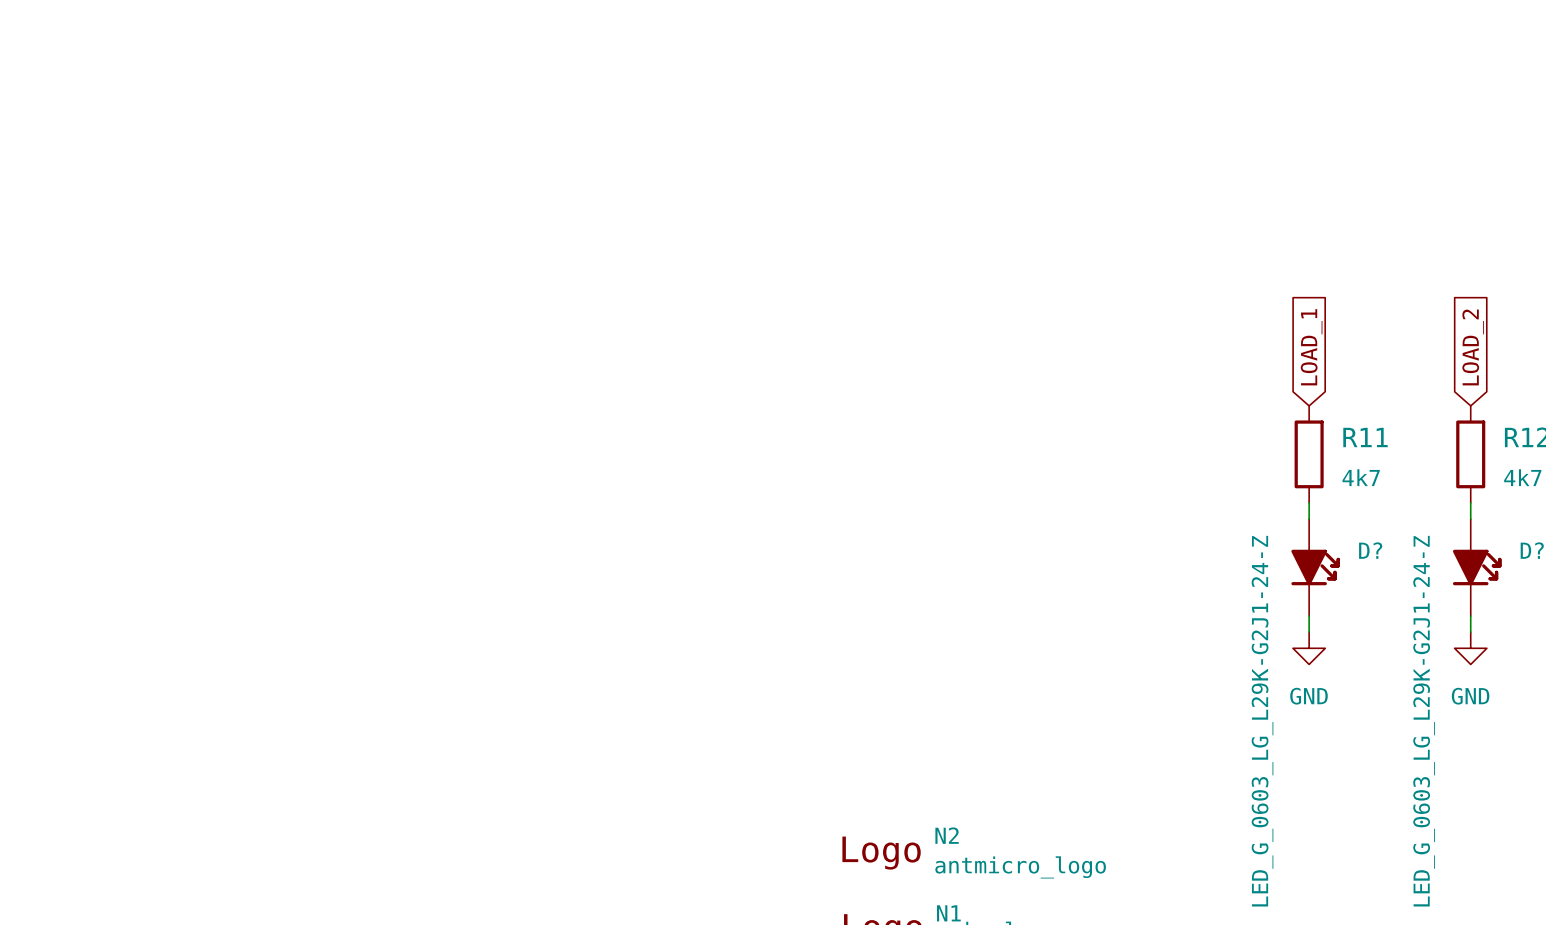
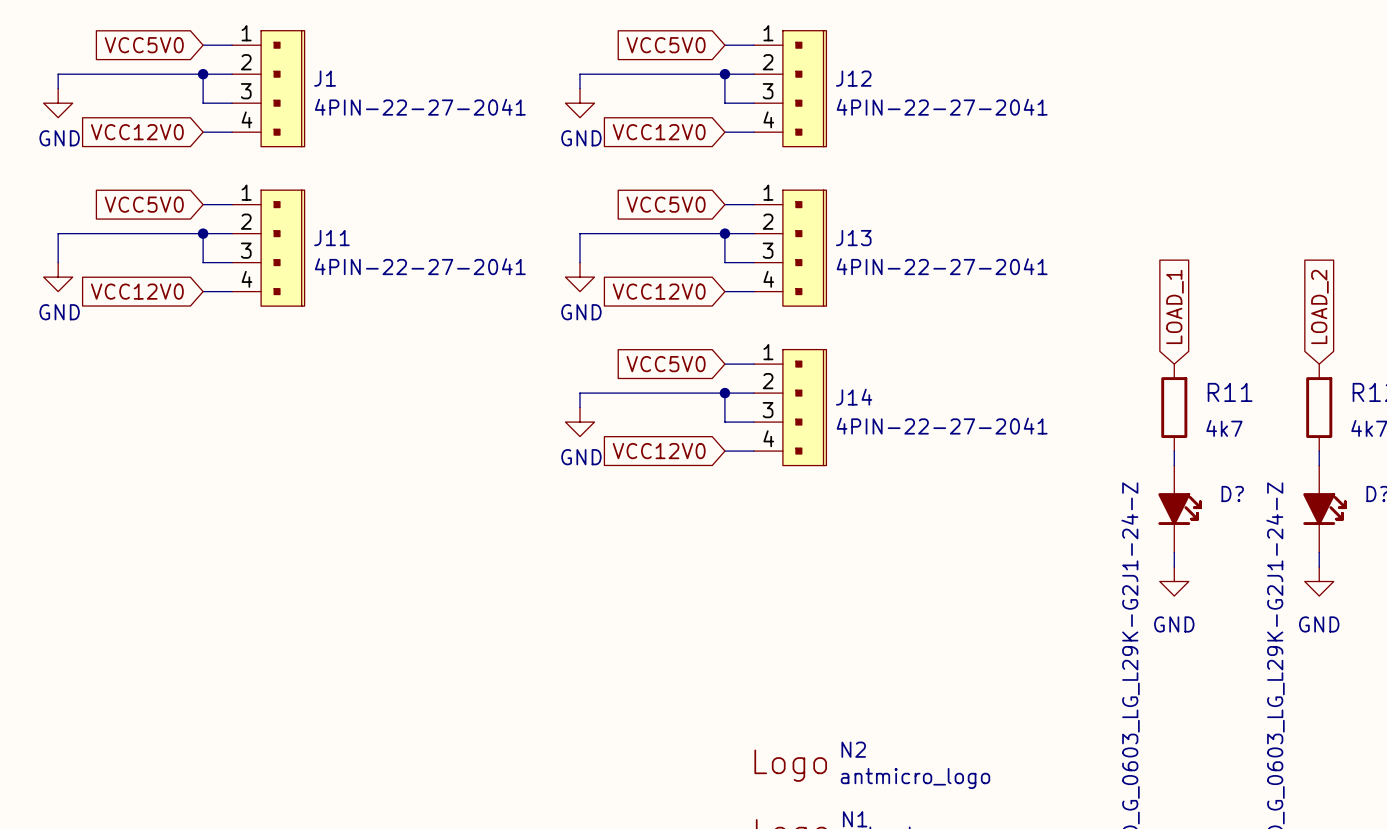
global label: none -> VCC5V0 (144, 45)
wire: none -> (203, 45) (232, 45)
global label: none -> VCC5V0 (666, 45)
wire: none -> (724, 45) (753, 45)
wire: none -> (203, 74) (203, 103) (232, 103)
junction: none -> (203, 74)
wire: none -> (232, 74) (58, 74) (58, 88)
wire: none -> (724, 74) (724, 103) (753, 103)
junction: none -> (724, 74)
wire: none -> (753, 74) (579, 74) (579, 88)
J1: none -> 4PIN-22-27-2041 (268, 88)
J12: none -> 4PIN-22-27-2041 (790, 88)
power symbol: none -> GND (58, 103)
power symbol: none -> GND (579, 103)
global label: none -> VCC12V0 (137, 132)
wire: none -> (203, 132) (232, 132)
global label: none -> VCC12V0 (659, 132)
wire: none -> (724, 132) (753, 132)
global label: none -> VCC5V0 (144, 204)
wire: none -> (203, 204) (232, 204)
global label: none -> VCC5V0 (666, 204)
wire: none -> (724, 204) (753, 204)
wire: none -> (203, 233) (203, 262) (232, 262)
junction: none -> (203, 233)
wire: none -> (232, 233) (58, 233) (58, 262)
wire: none -> (724, 233) (724, 262) (753, 262)
junction: none -> (724, 233)
wire: none -> (753, 233) (579, 233) (579, 262)
J11: none -> 4PIN-22-27-2041 (268, 248)
J13: none -> 4PIN-22-27-2041 (790, 248)
power symbol: none -> GND (58, 277)
power symbol: none -> GND (579, 277)
global label: none -> VCC12V0 (137, 291)
wire: none -> (203, 291) (232, 291)
global label: none -> VCC12V0 (659, 291)
wire: none -> (724, 291) (753, 291)
global label: none -> VCC5V0 (666, 364)
wire: none -> (724, 364) (753, 364)
wire: none -> (724, 393) (724, 422) (753, 422)
junction: none -> (724, 393)
wire: none -> (753, 393) (579, 393) (579, 407)
J14: none -> 4PIN-22-27-2041 (790, 407)
power symbol: none -> GND (579, 422)
global label: none -> VCC12V0 (659, 451)
wire: none -> (724, 451) (753, 451)

